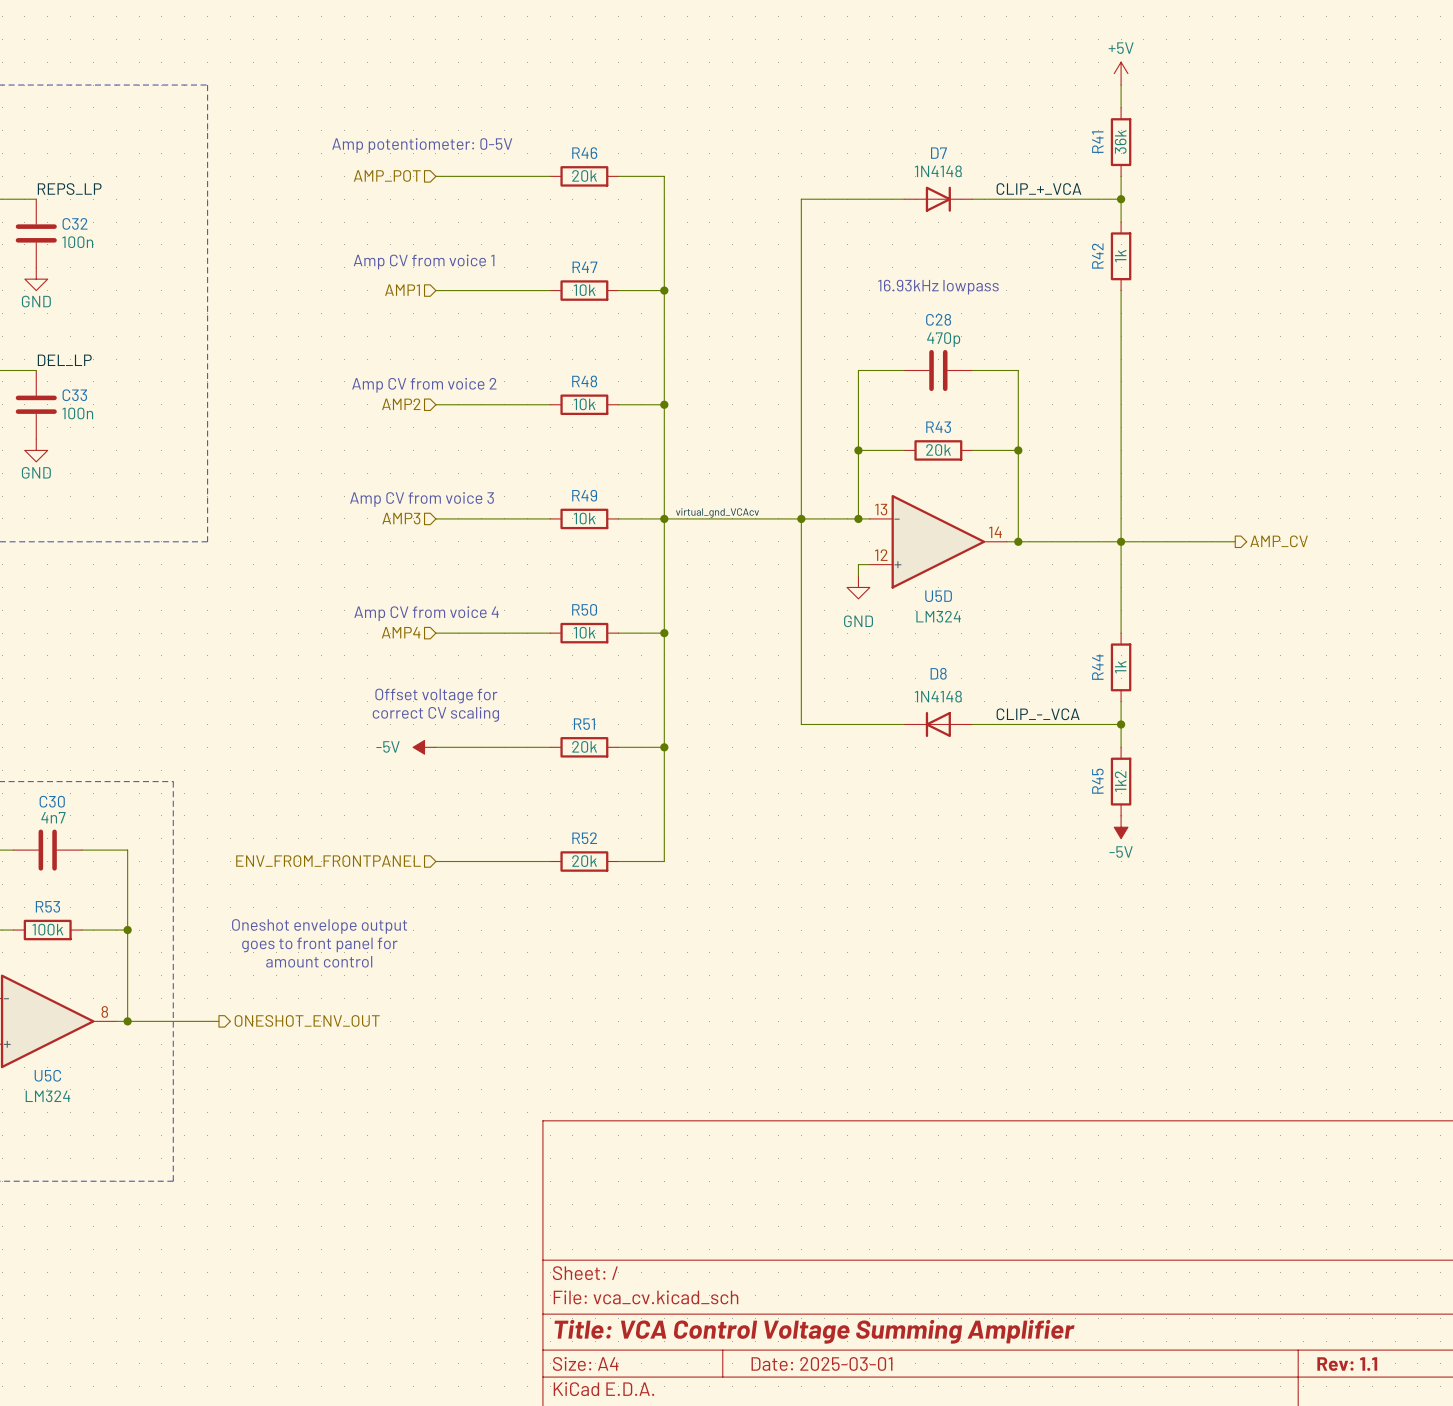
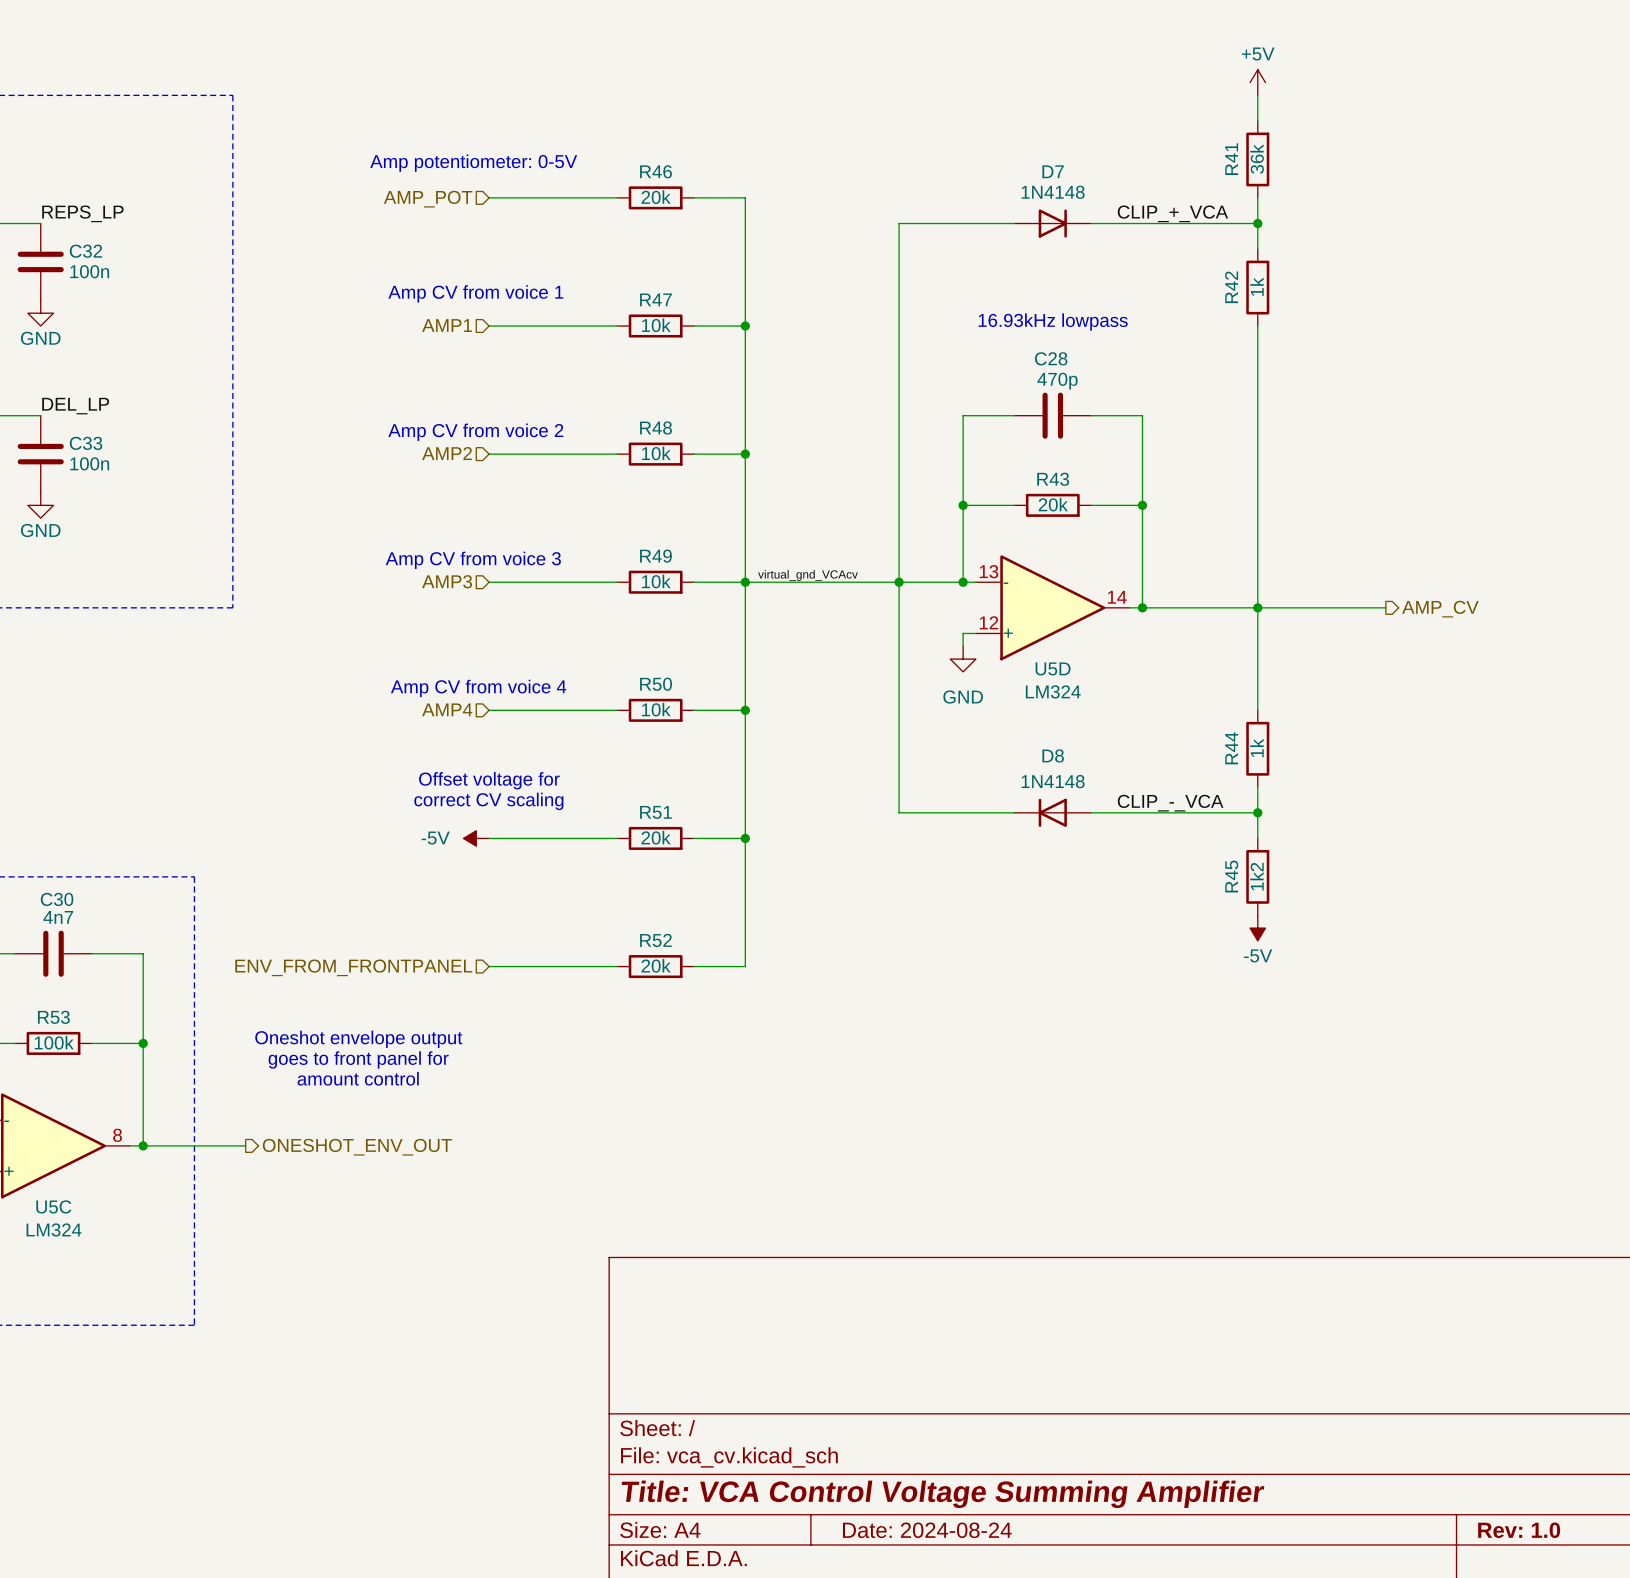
title block: Date: 2025-03-01 (821, 1363) -> Date: 2024-08-24 (927, 1530)
title block: Rev: 1.1 (1347, 1364) -> Rev: 1.0 (1519, 1530)

